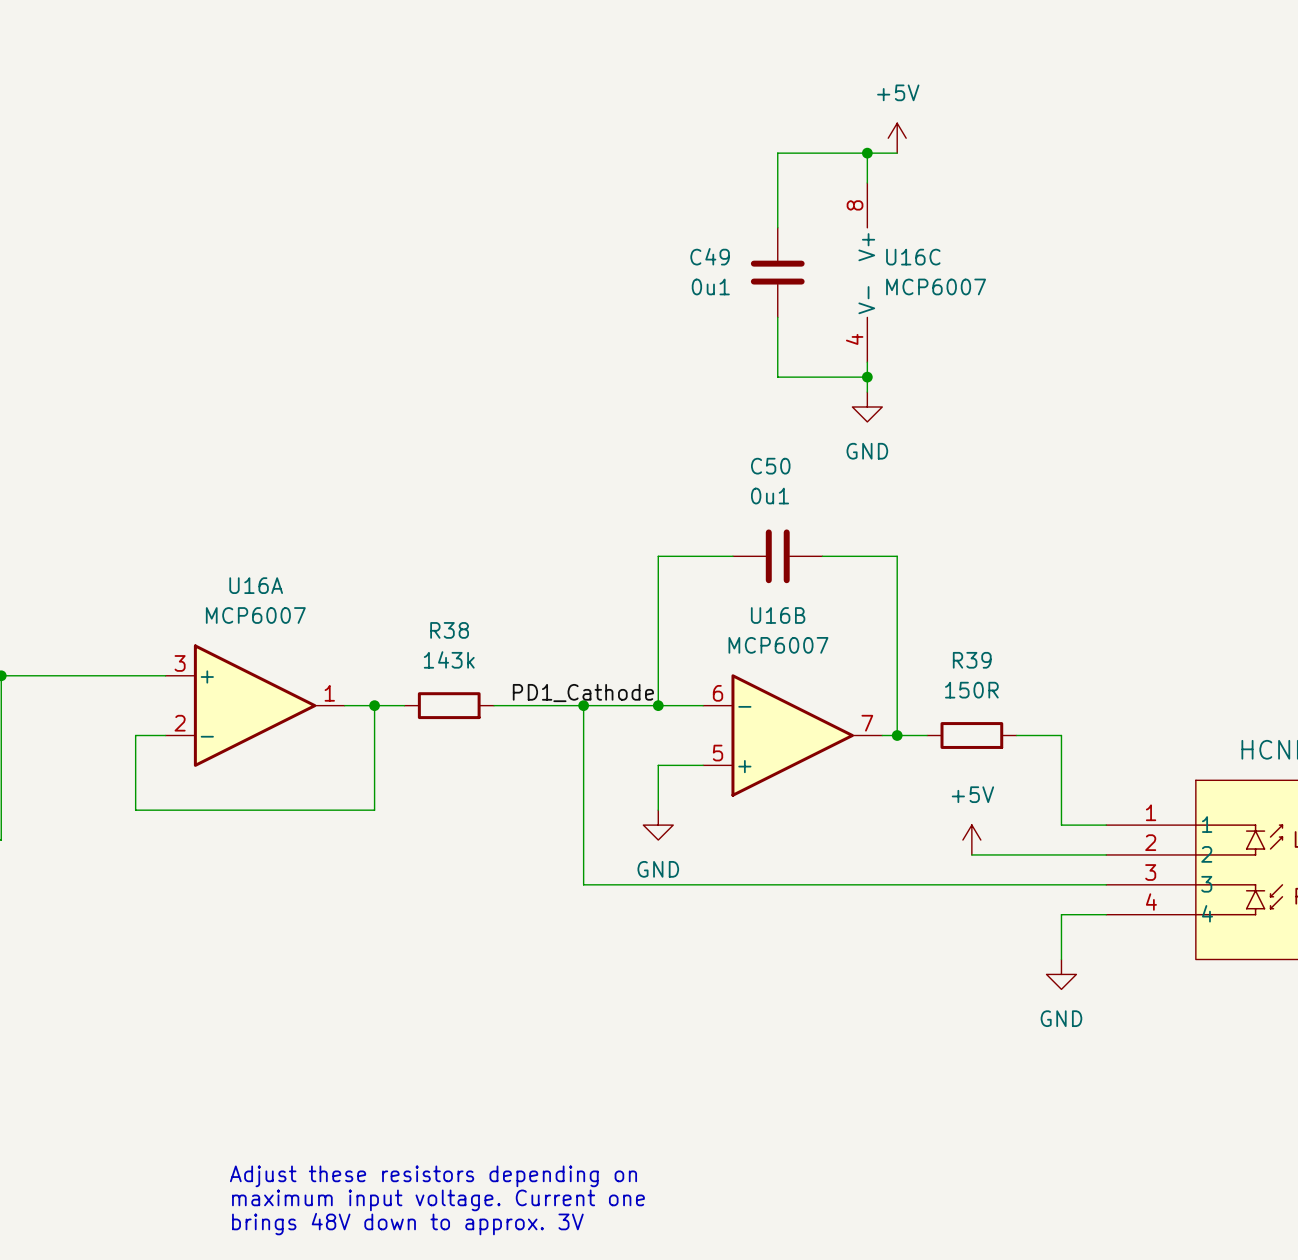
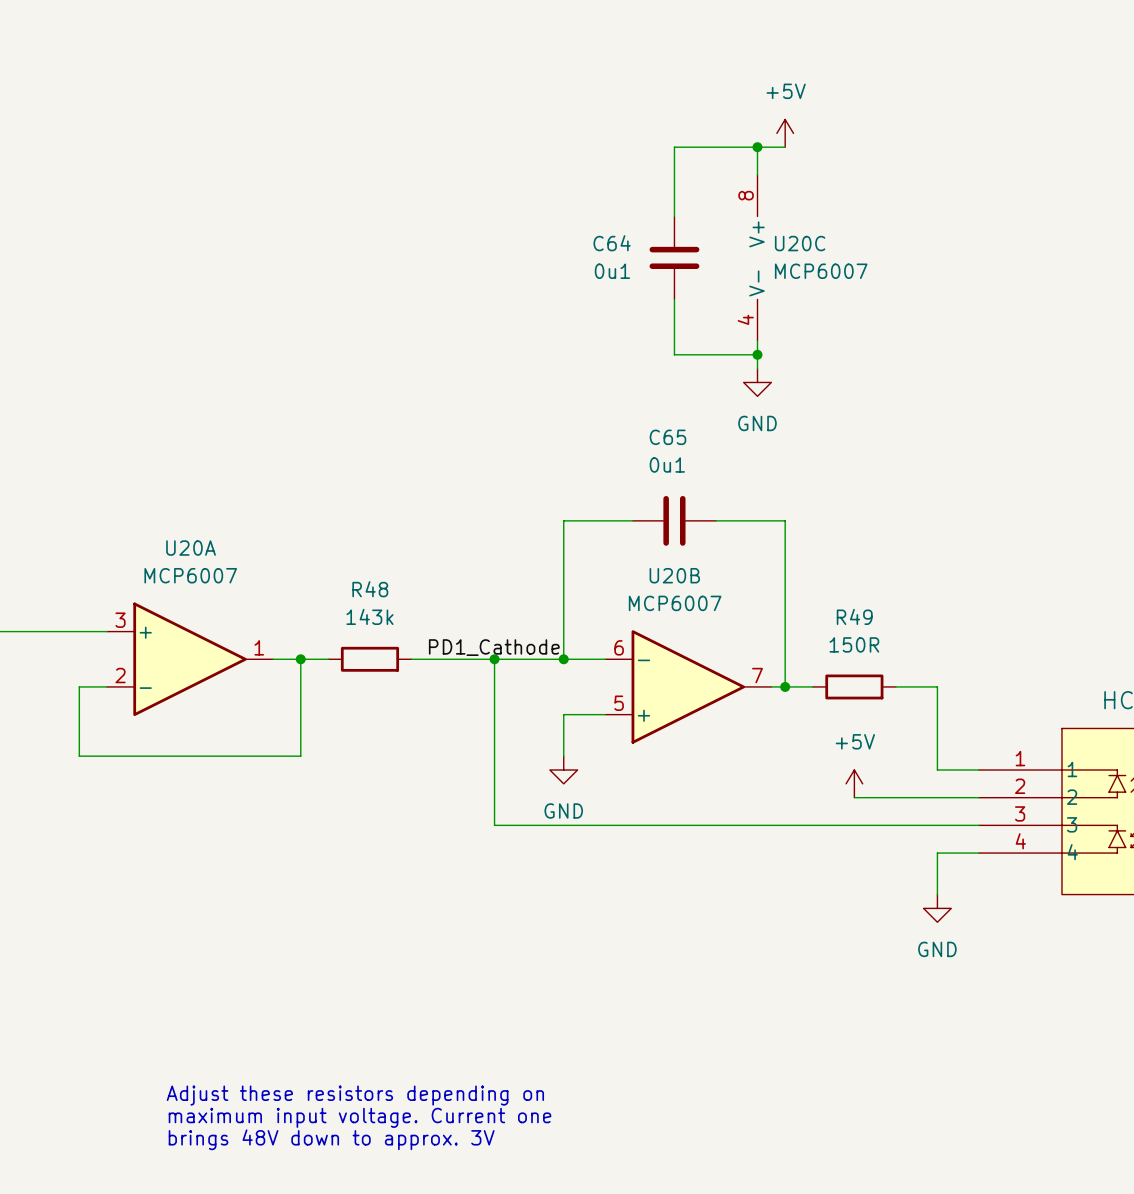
C49 name: C49 (710, 256) -> C64 (612, 243)
U16C name: U16C (913, 257) -> U20C (800, 243)
C50 name: C50 (770, 466) -> C65 (667, 437)
U16A name: U16A (256, 585) -> U20A (191, 548)
U16B name: U16B (778, 615) -> U20B (674, 575)
R38 name: R38 (449, 630) -> R48 (370, 589)
R39 name: R39 (972, 660) -> R49 (854, 616)

